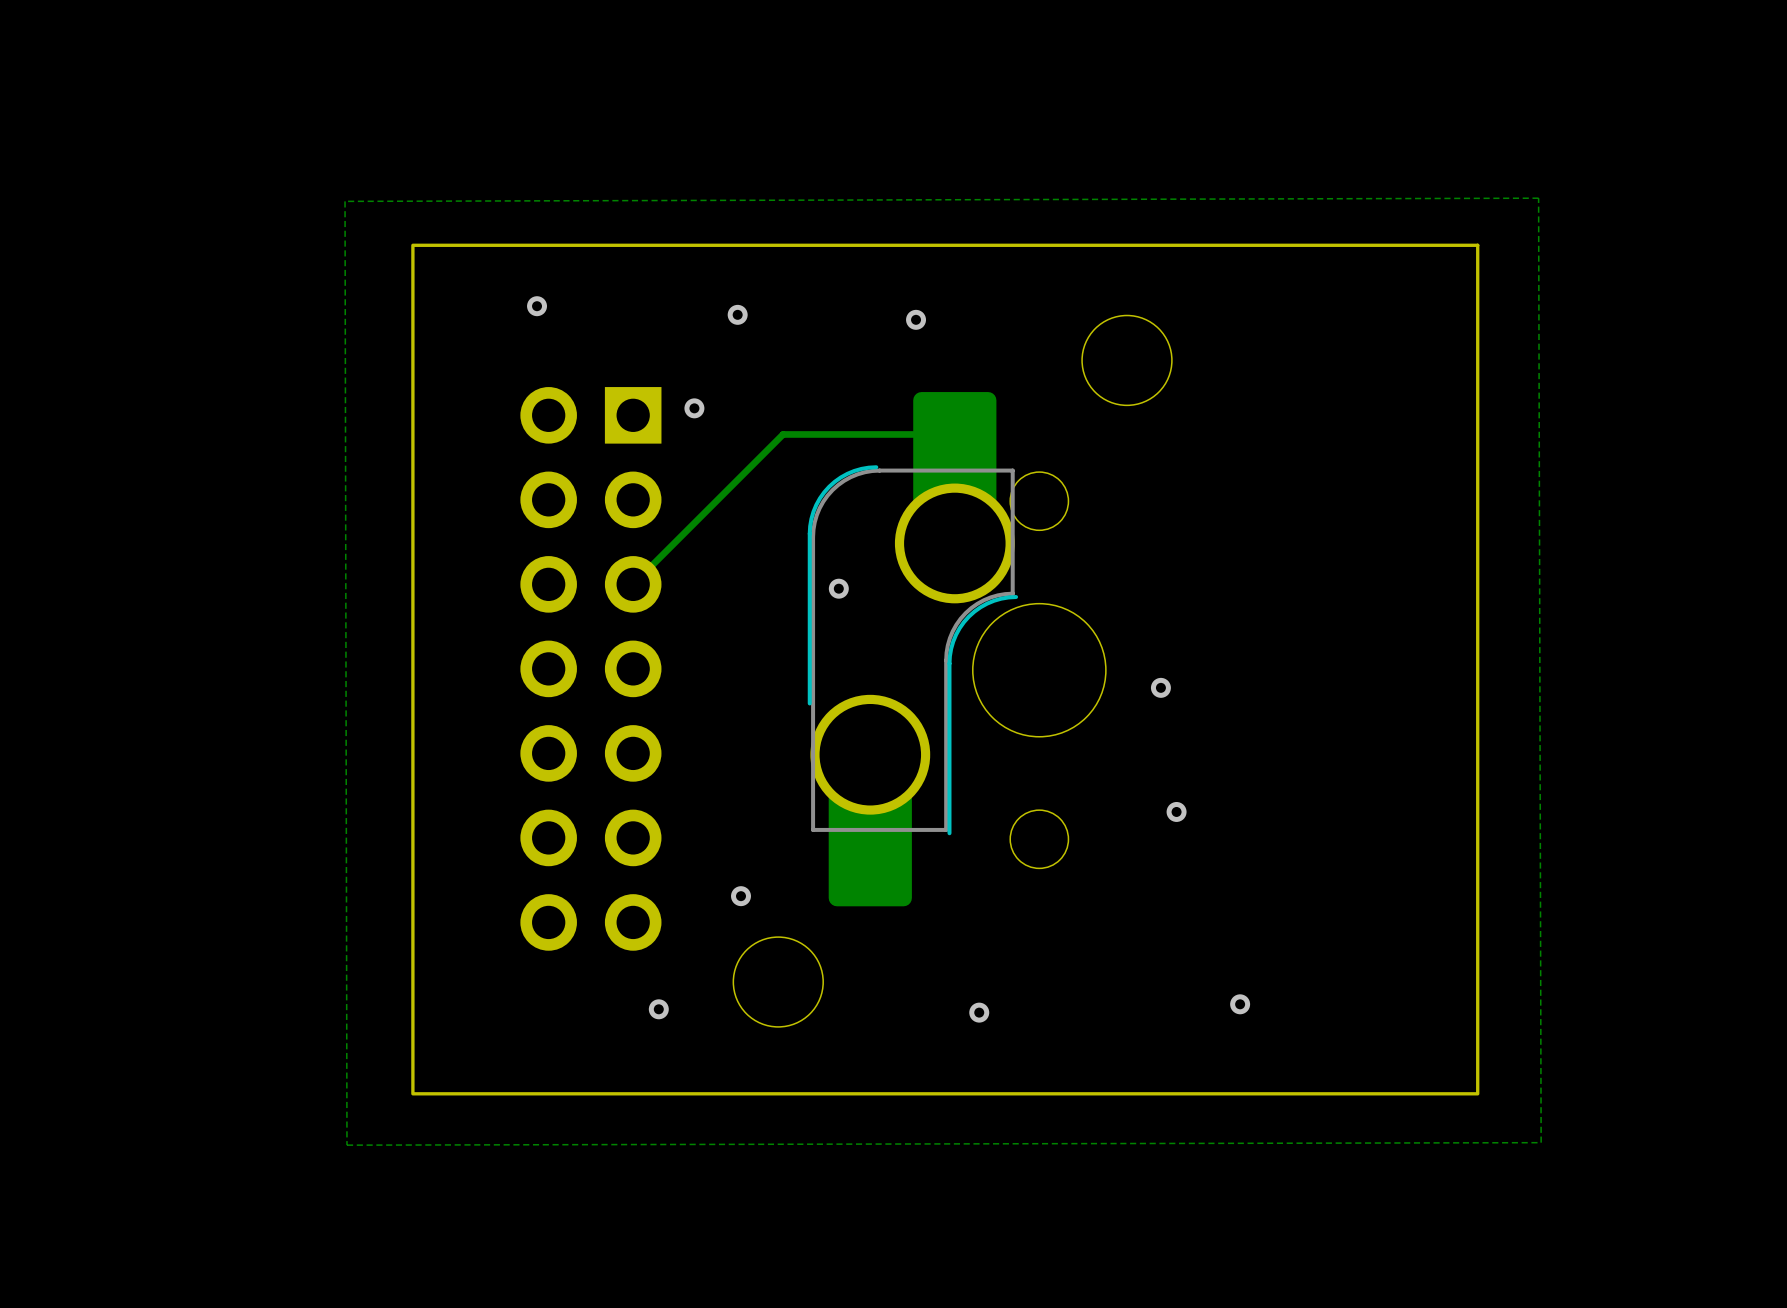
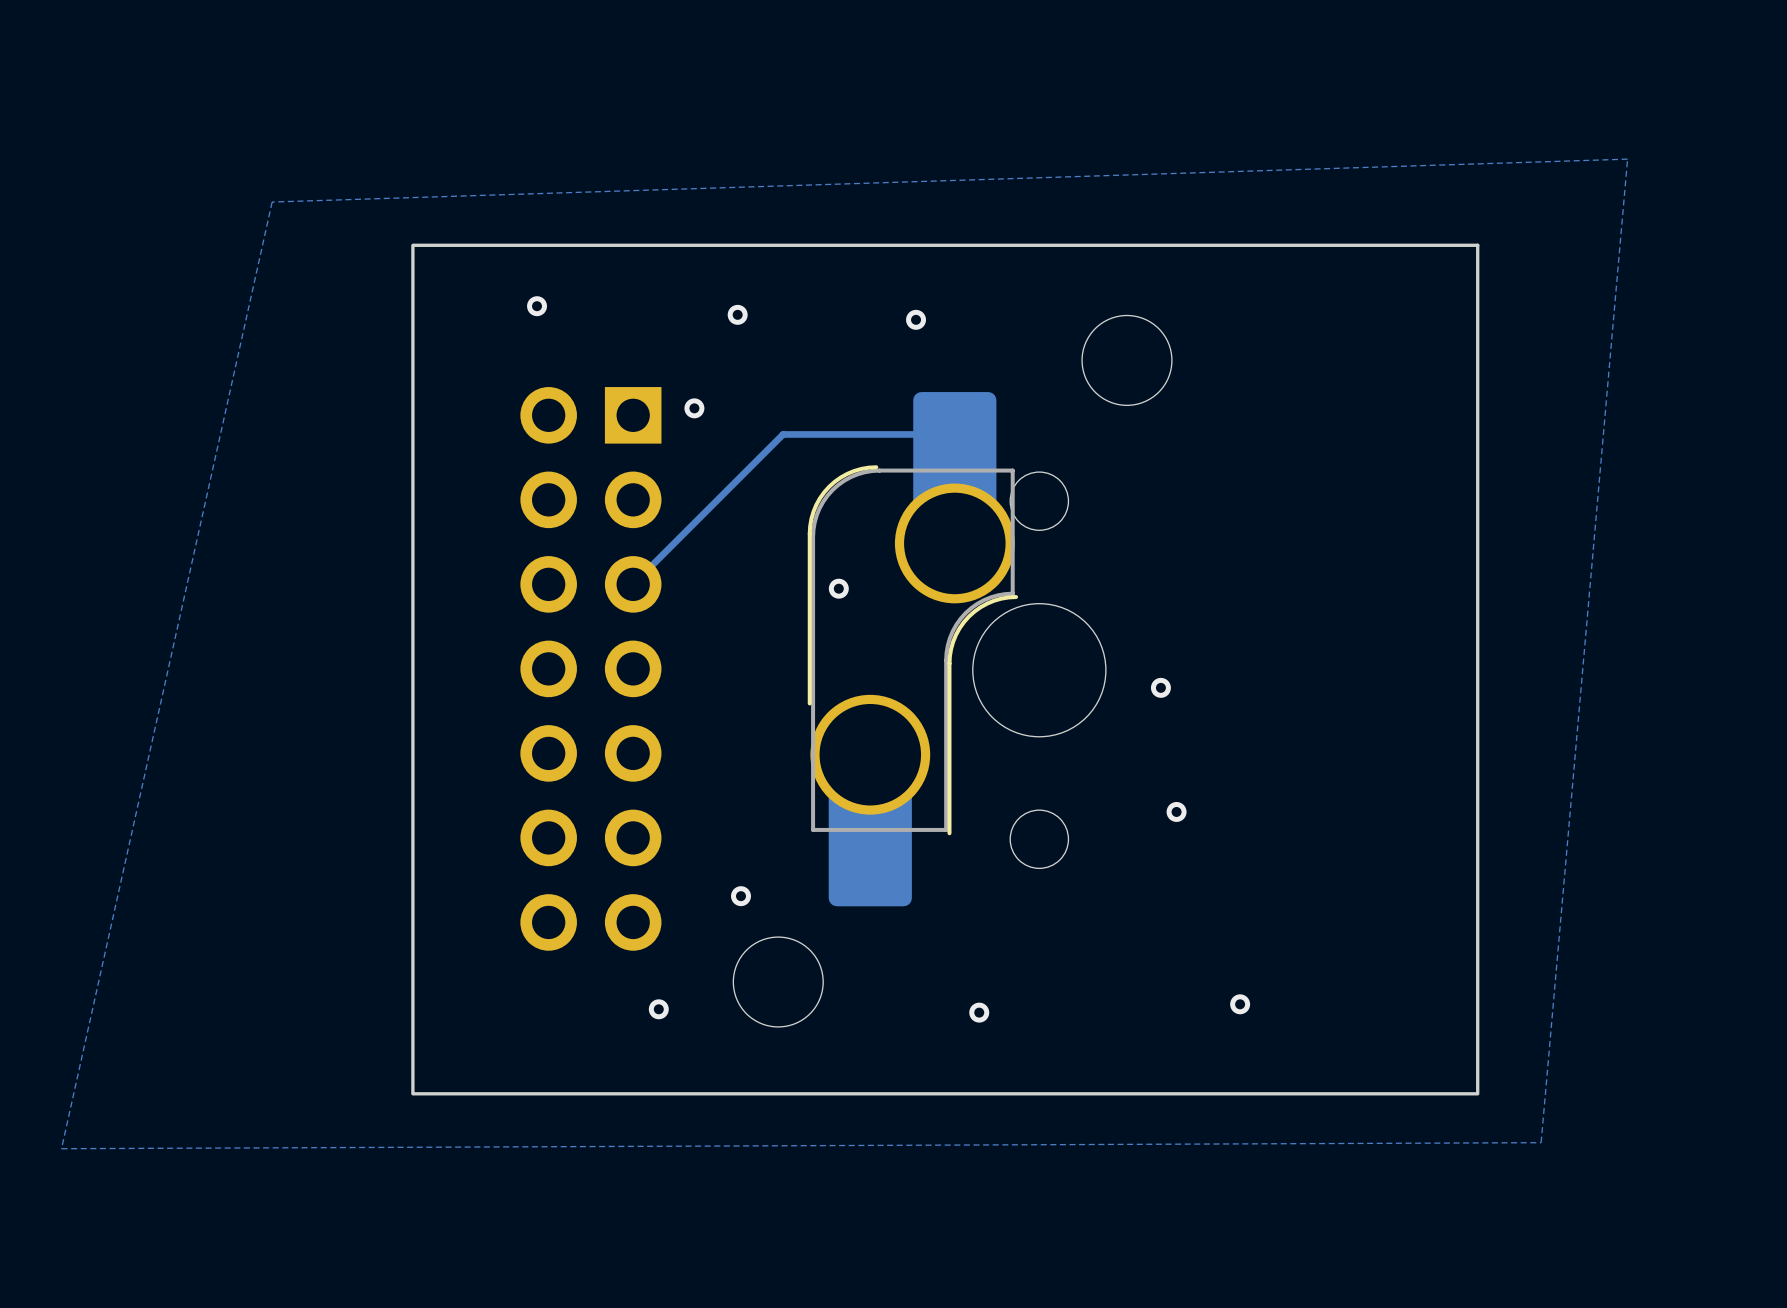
zone outline: (1538, 198) (345, 201) (346, 1145) (1541, 1142) (1538, 198) -> (1627, 159) (1541, 1142) (61, 1148) (272, 202) (1627, 159)

